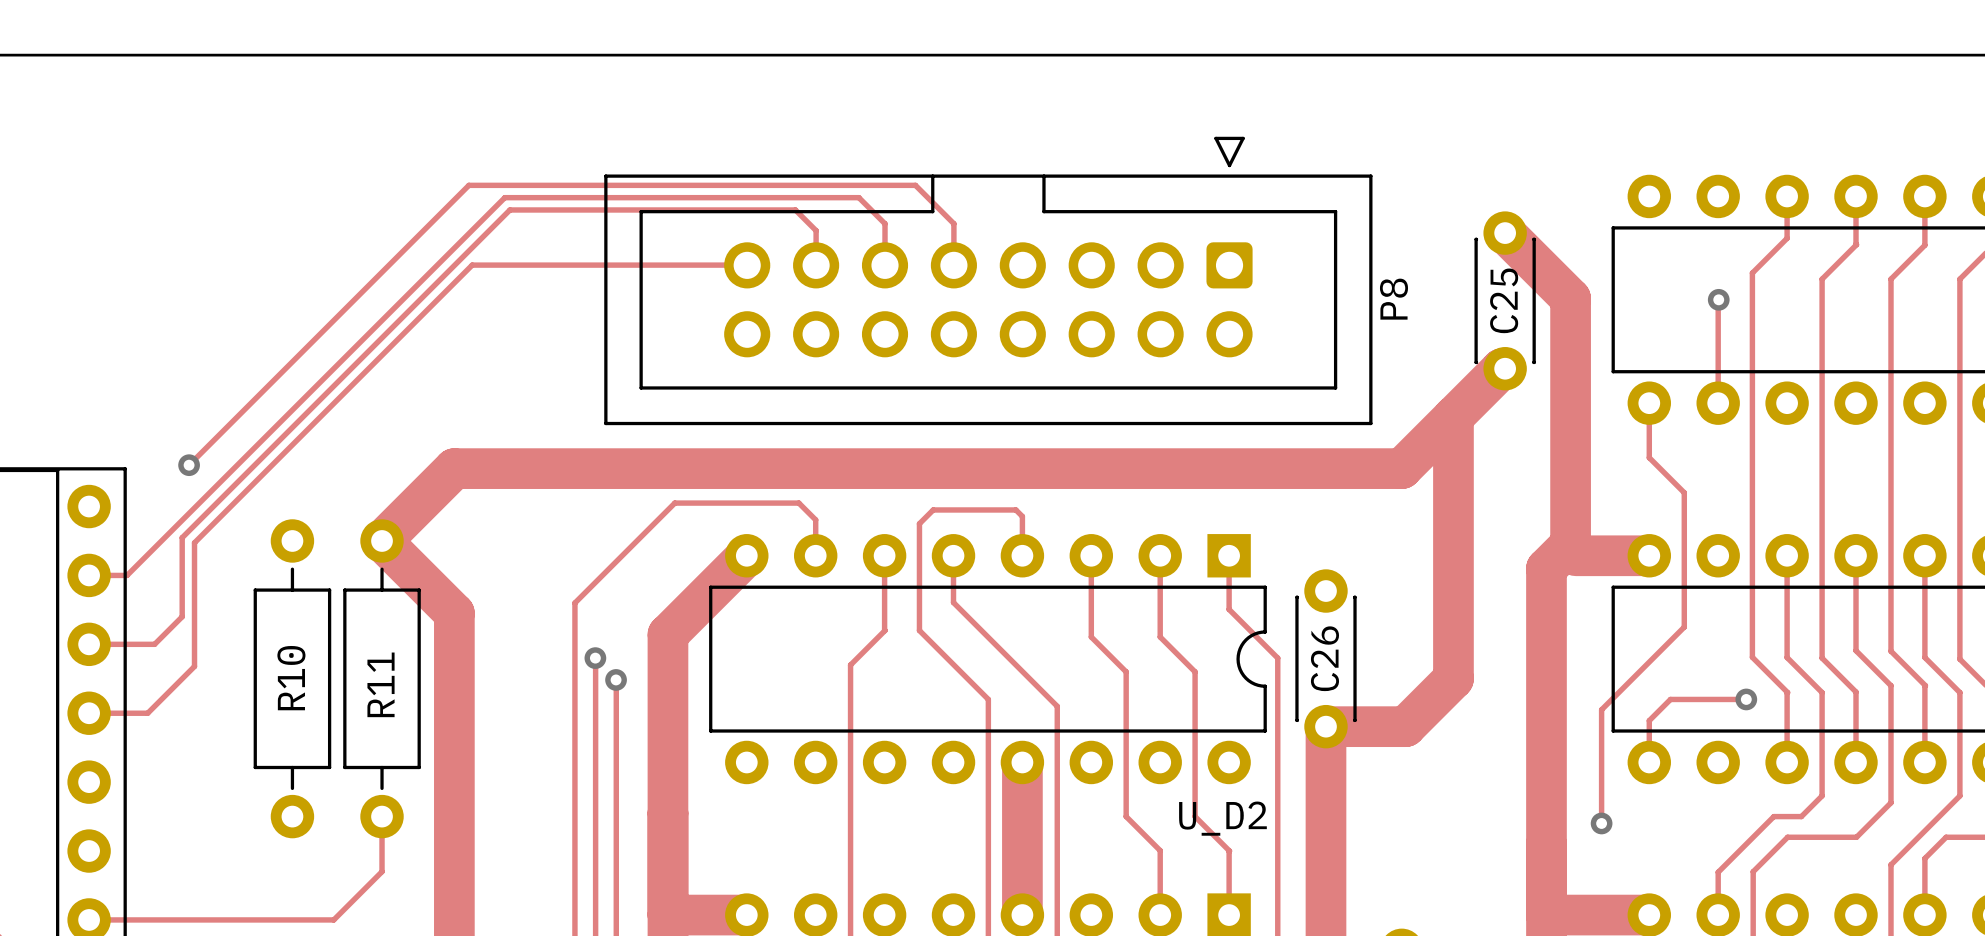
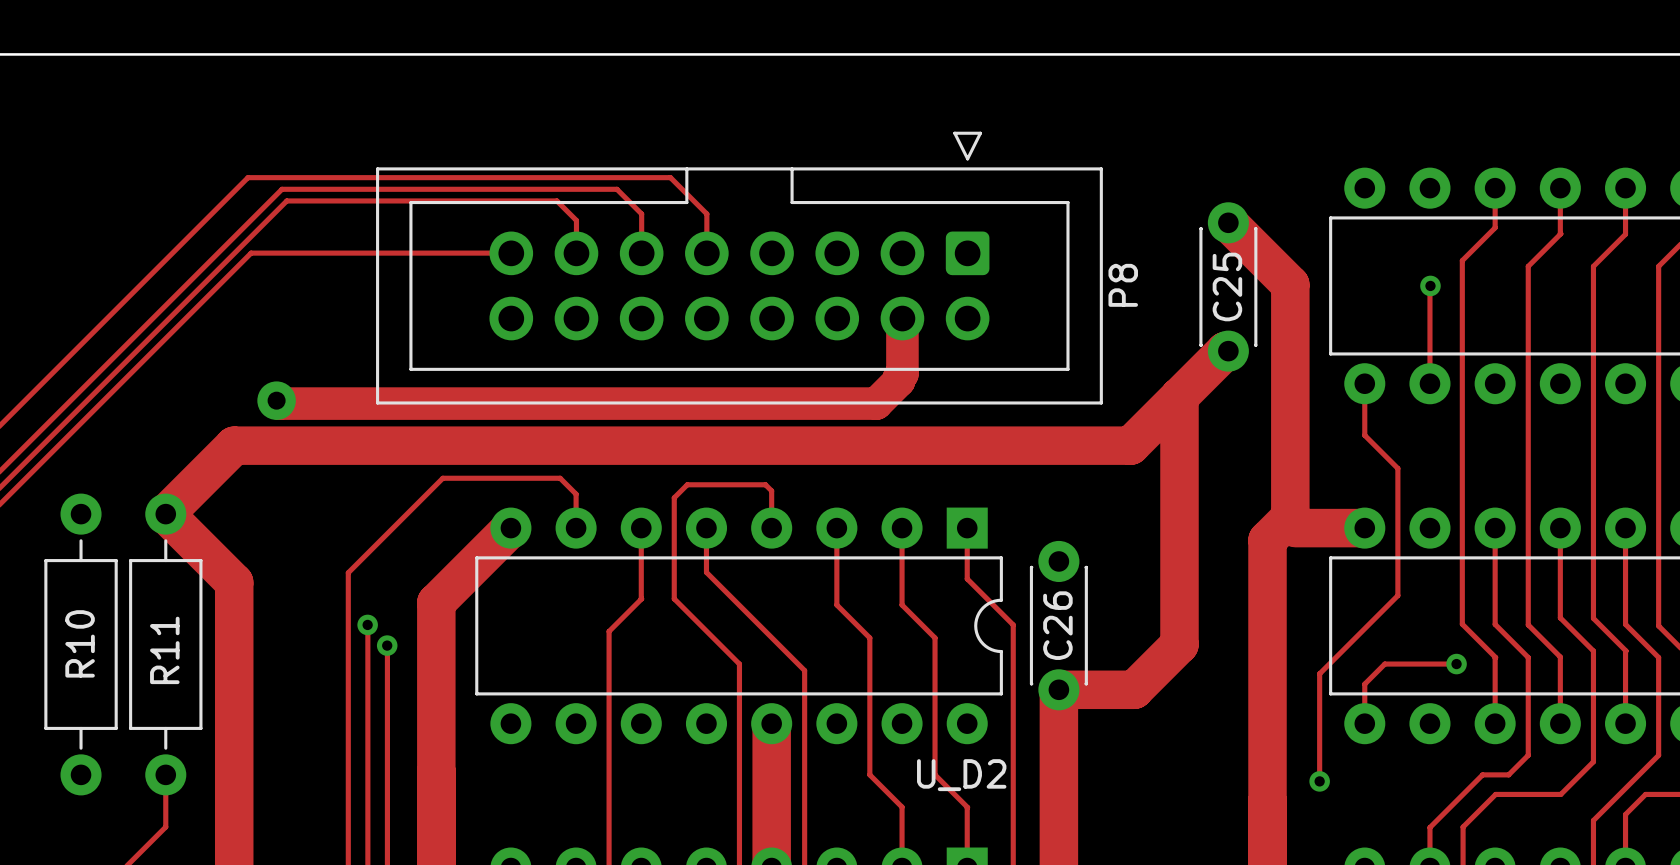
track: none -> (902, 318) (902, 373) (899, 377) (899, 380) (876, 403) (279, 403) (276, 400)
via: none -> (276, 400)

